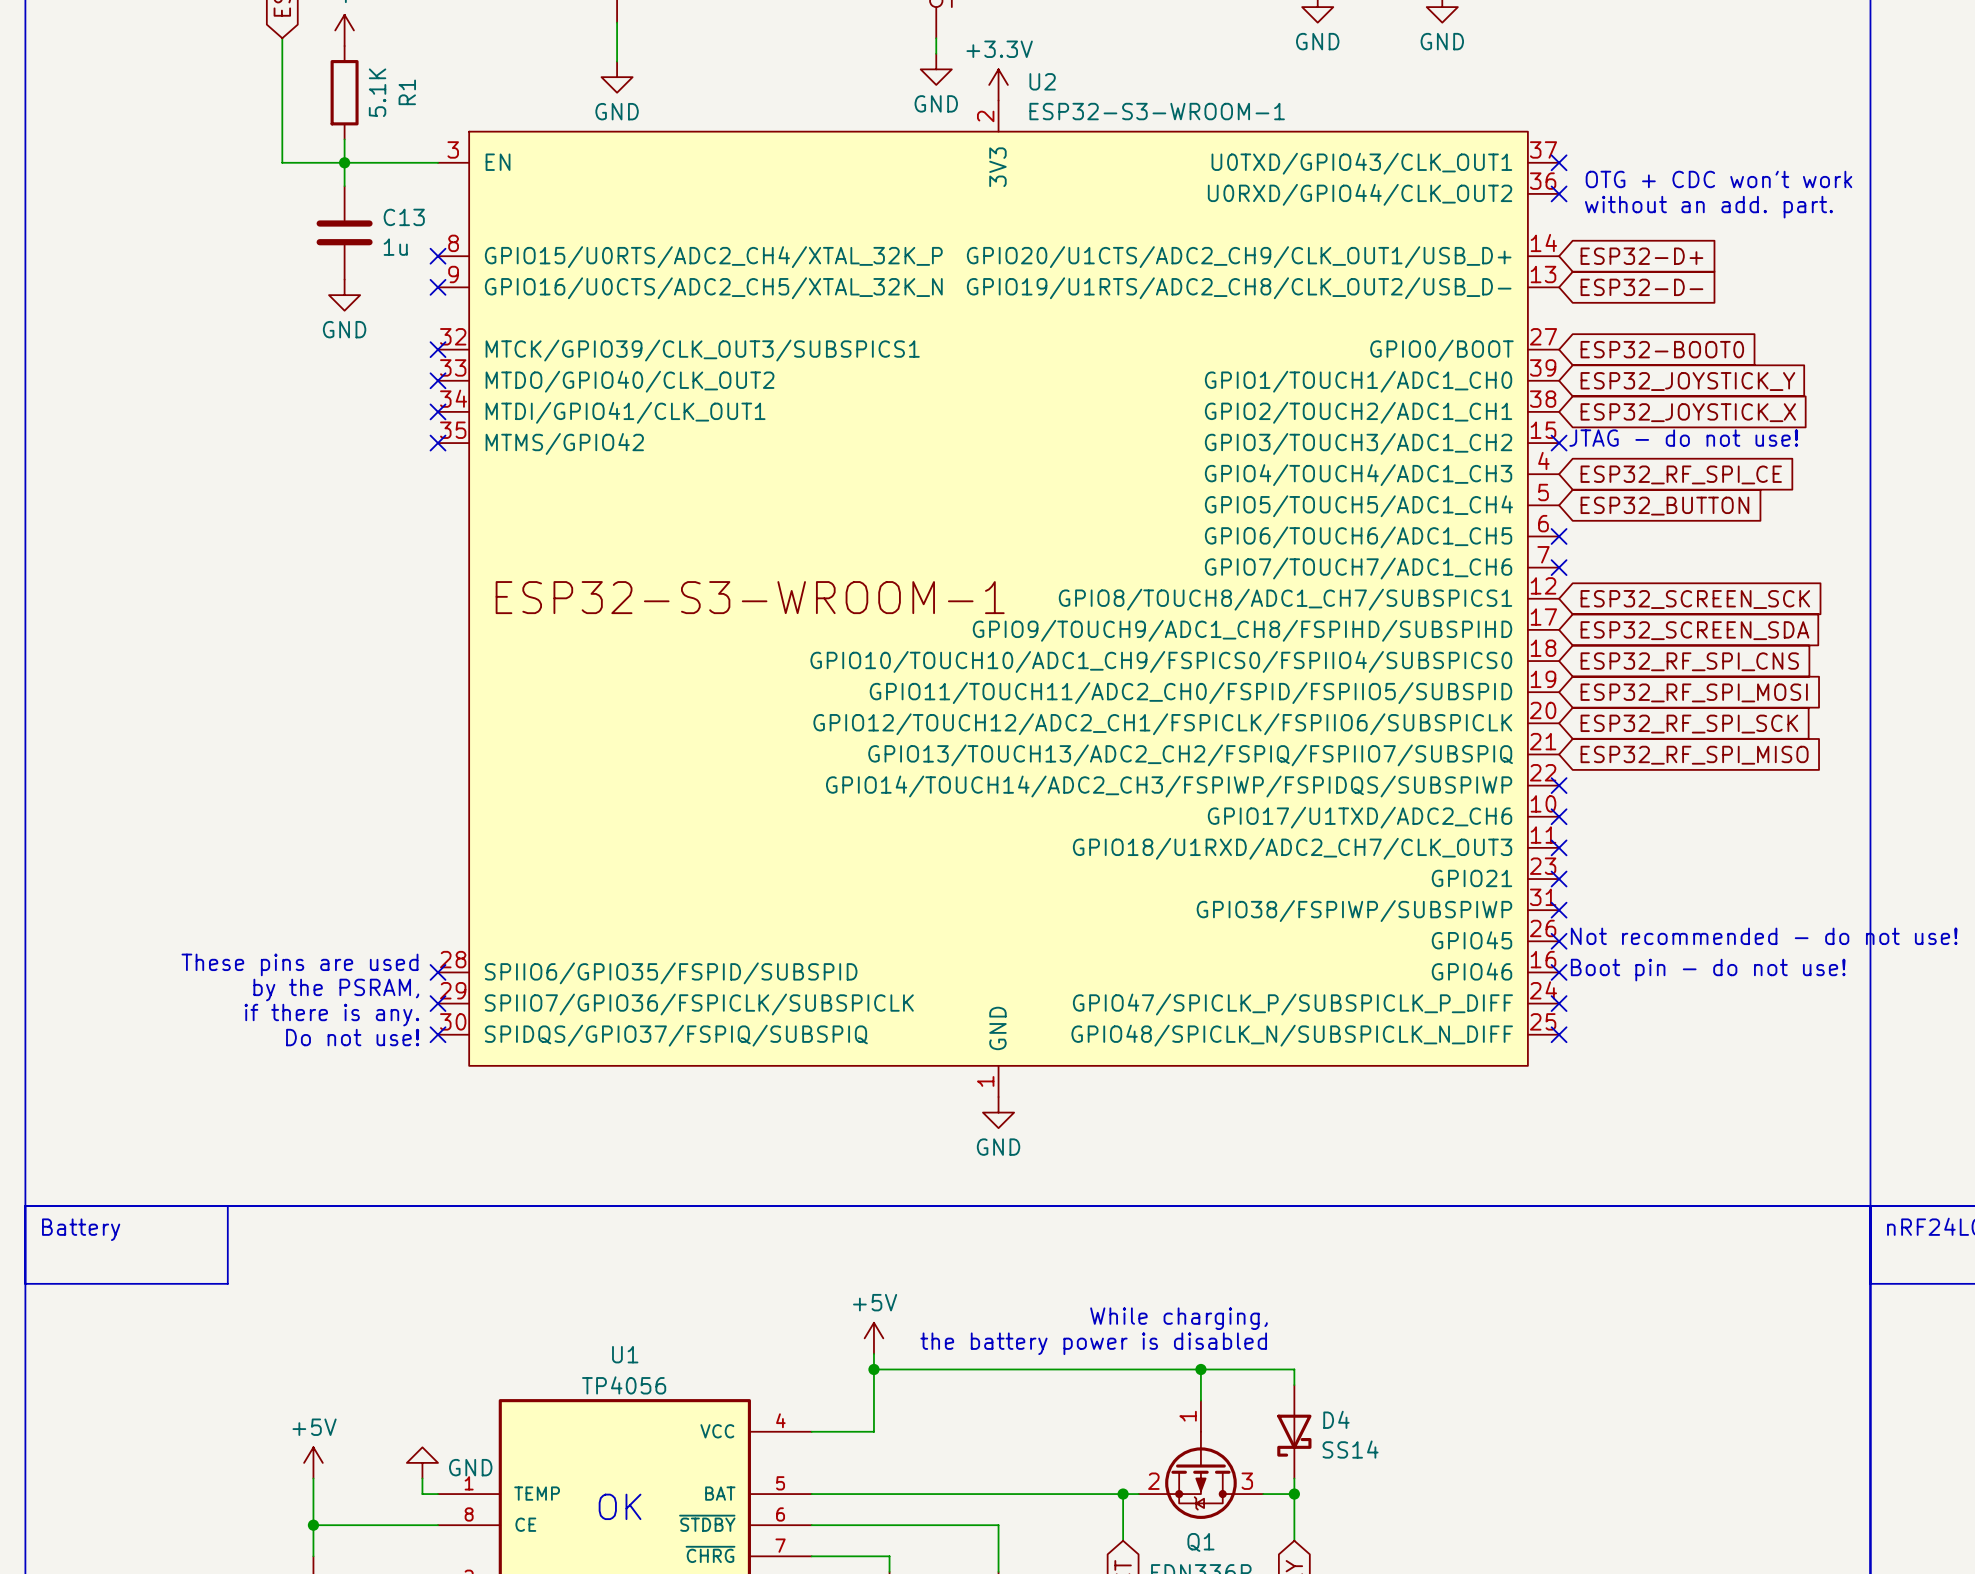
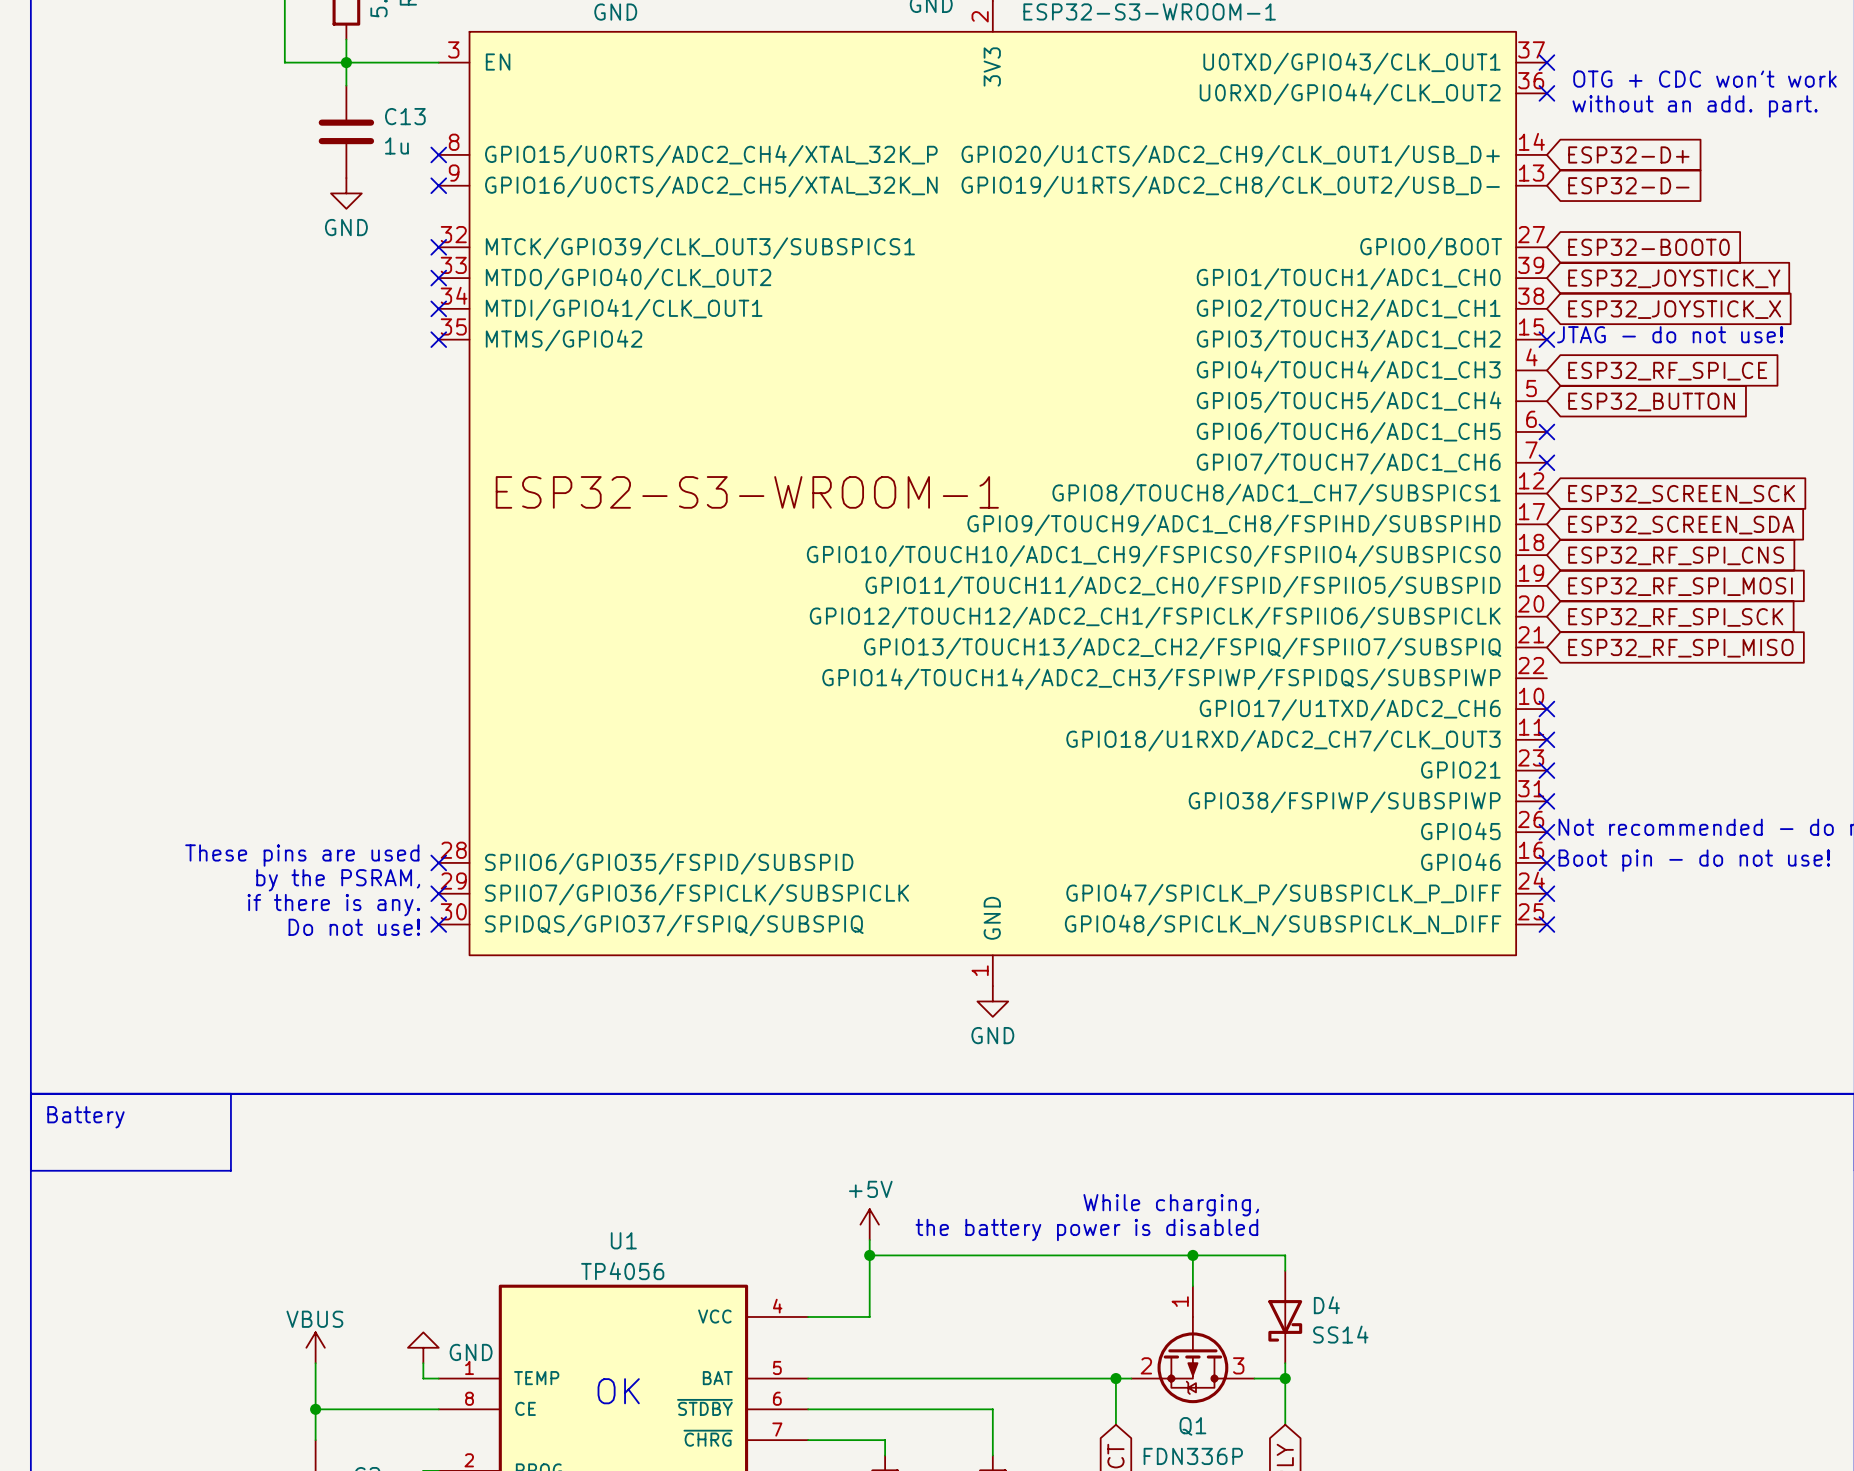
no-connect mark: (1559, 785) -> none
power symbol: +5V (313, 1462) -> VBUS (315, 1347)

